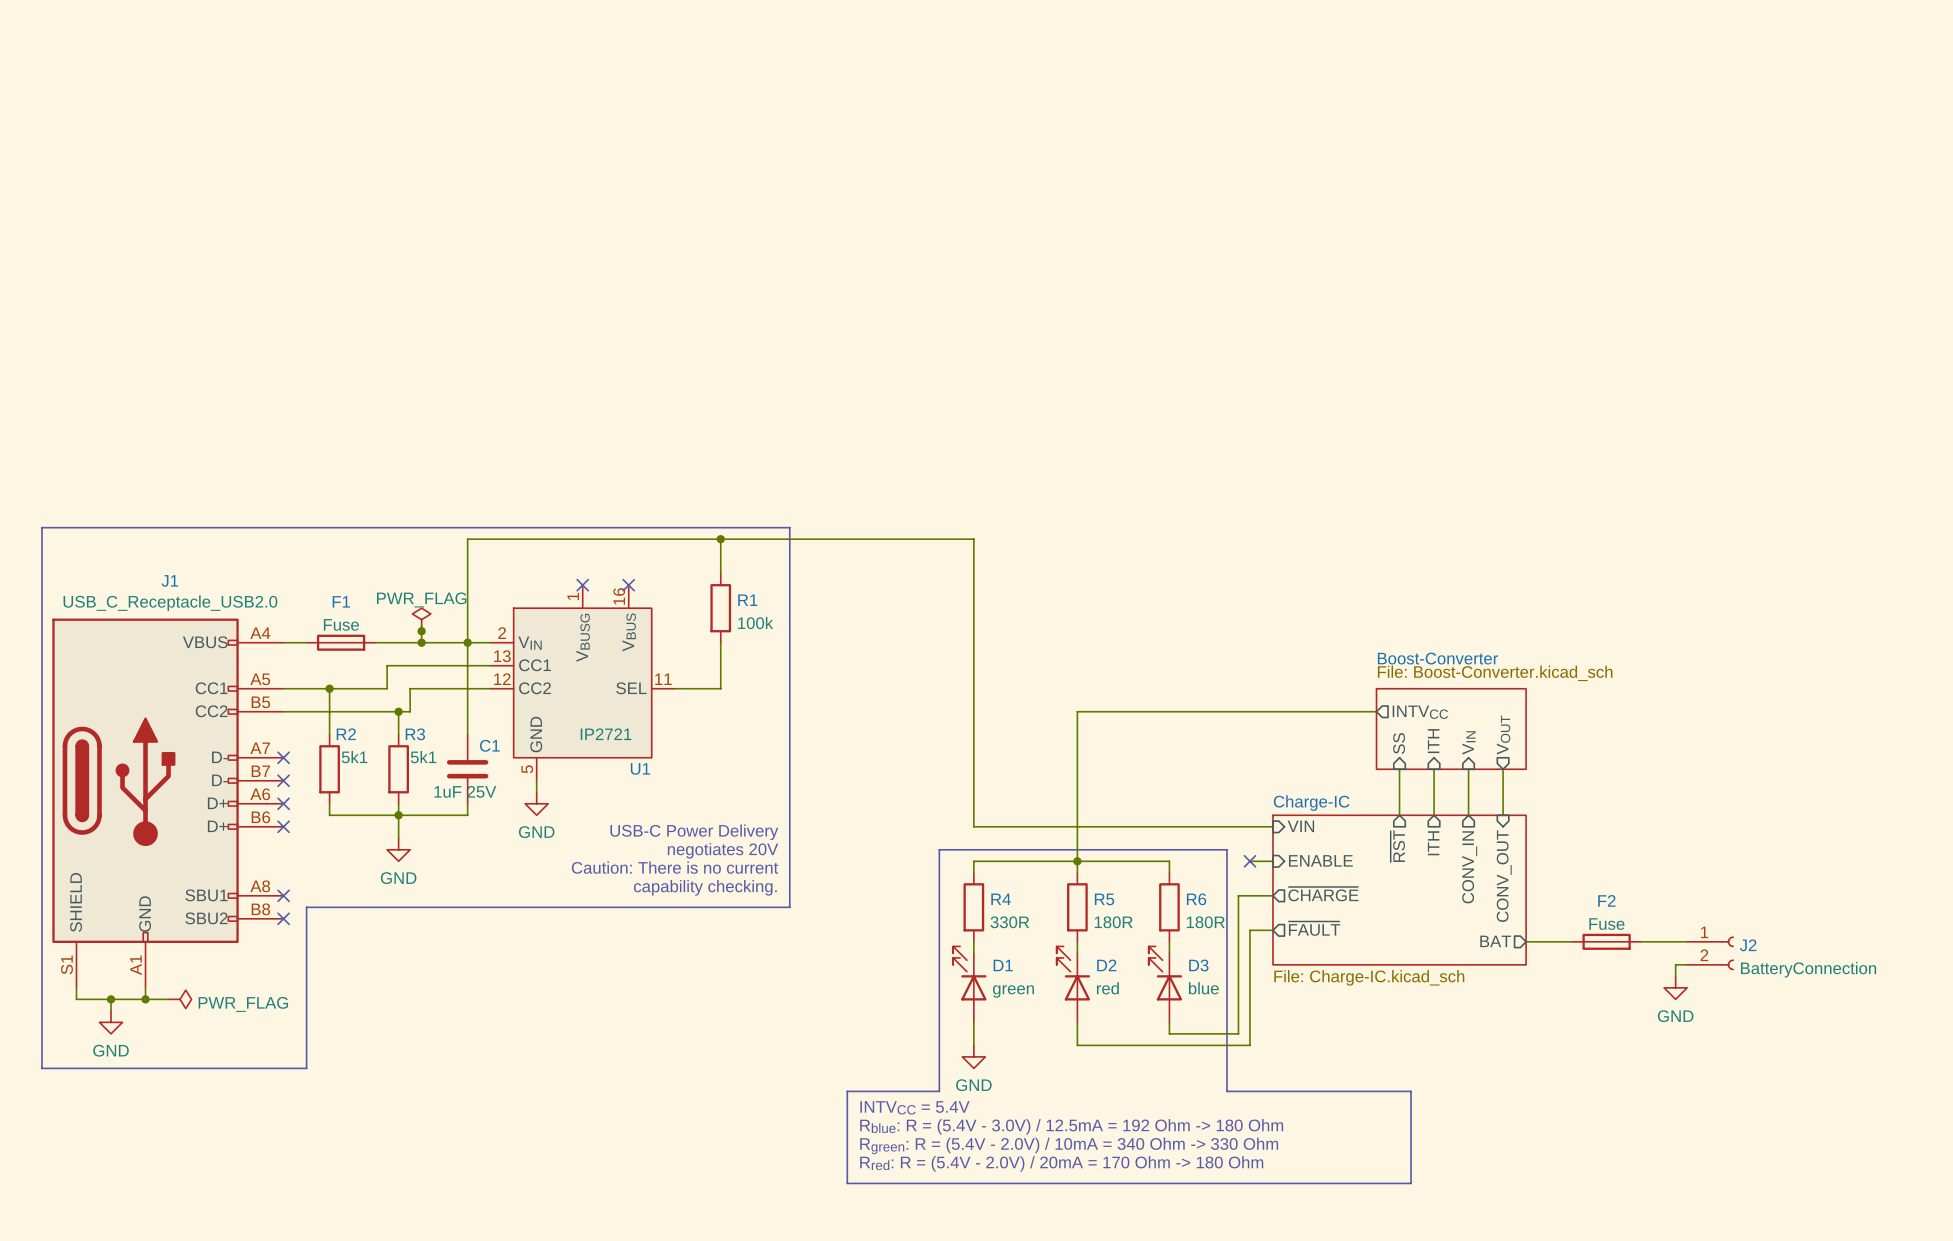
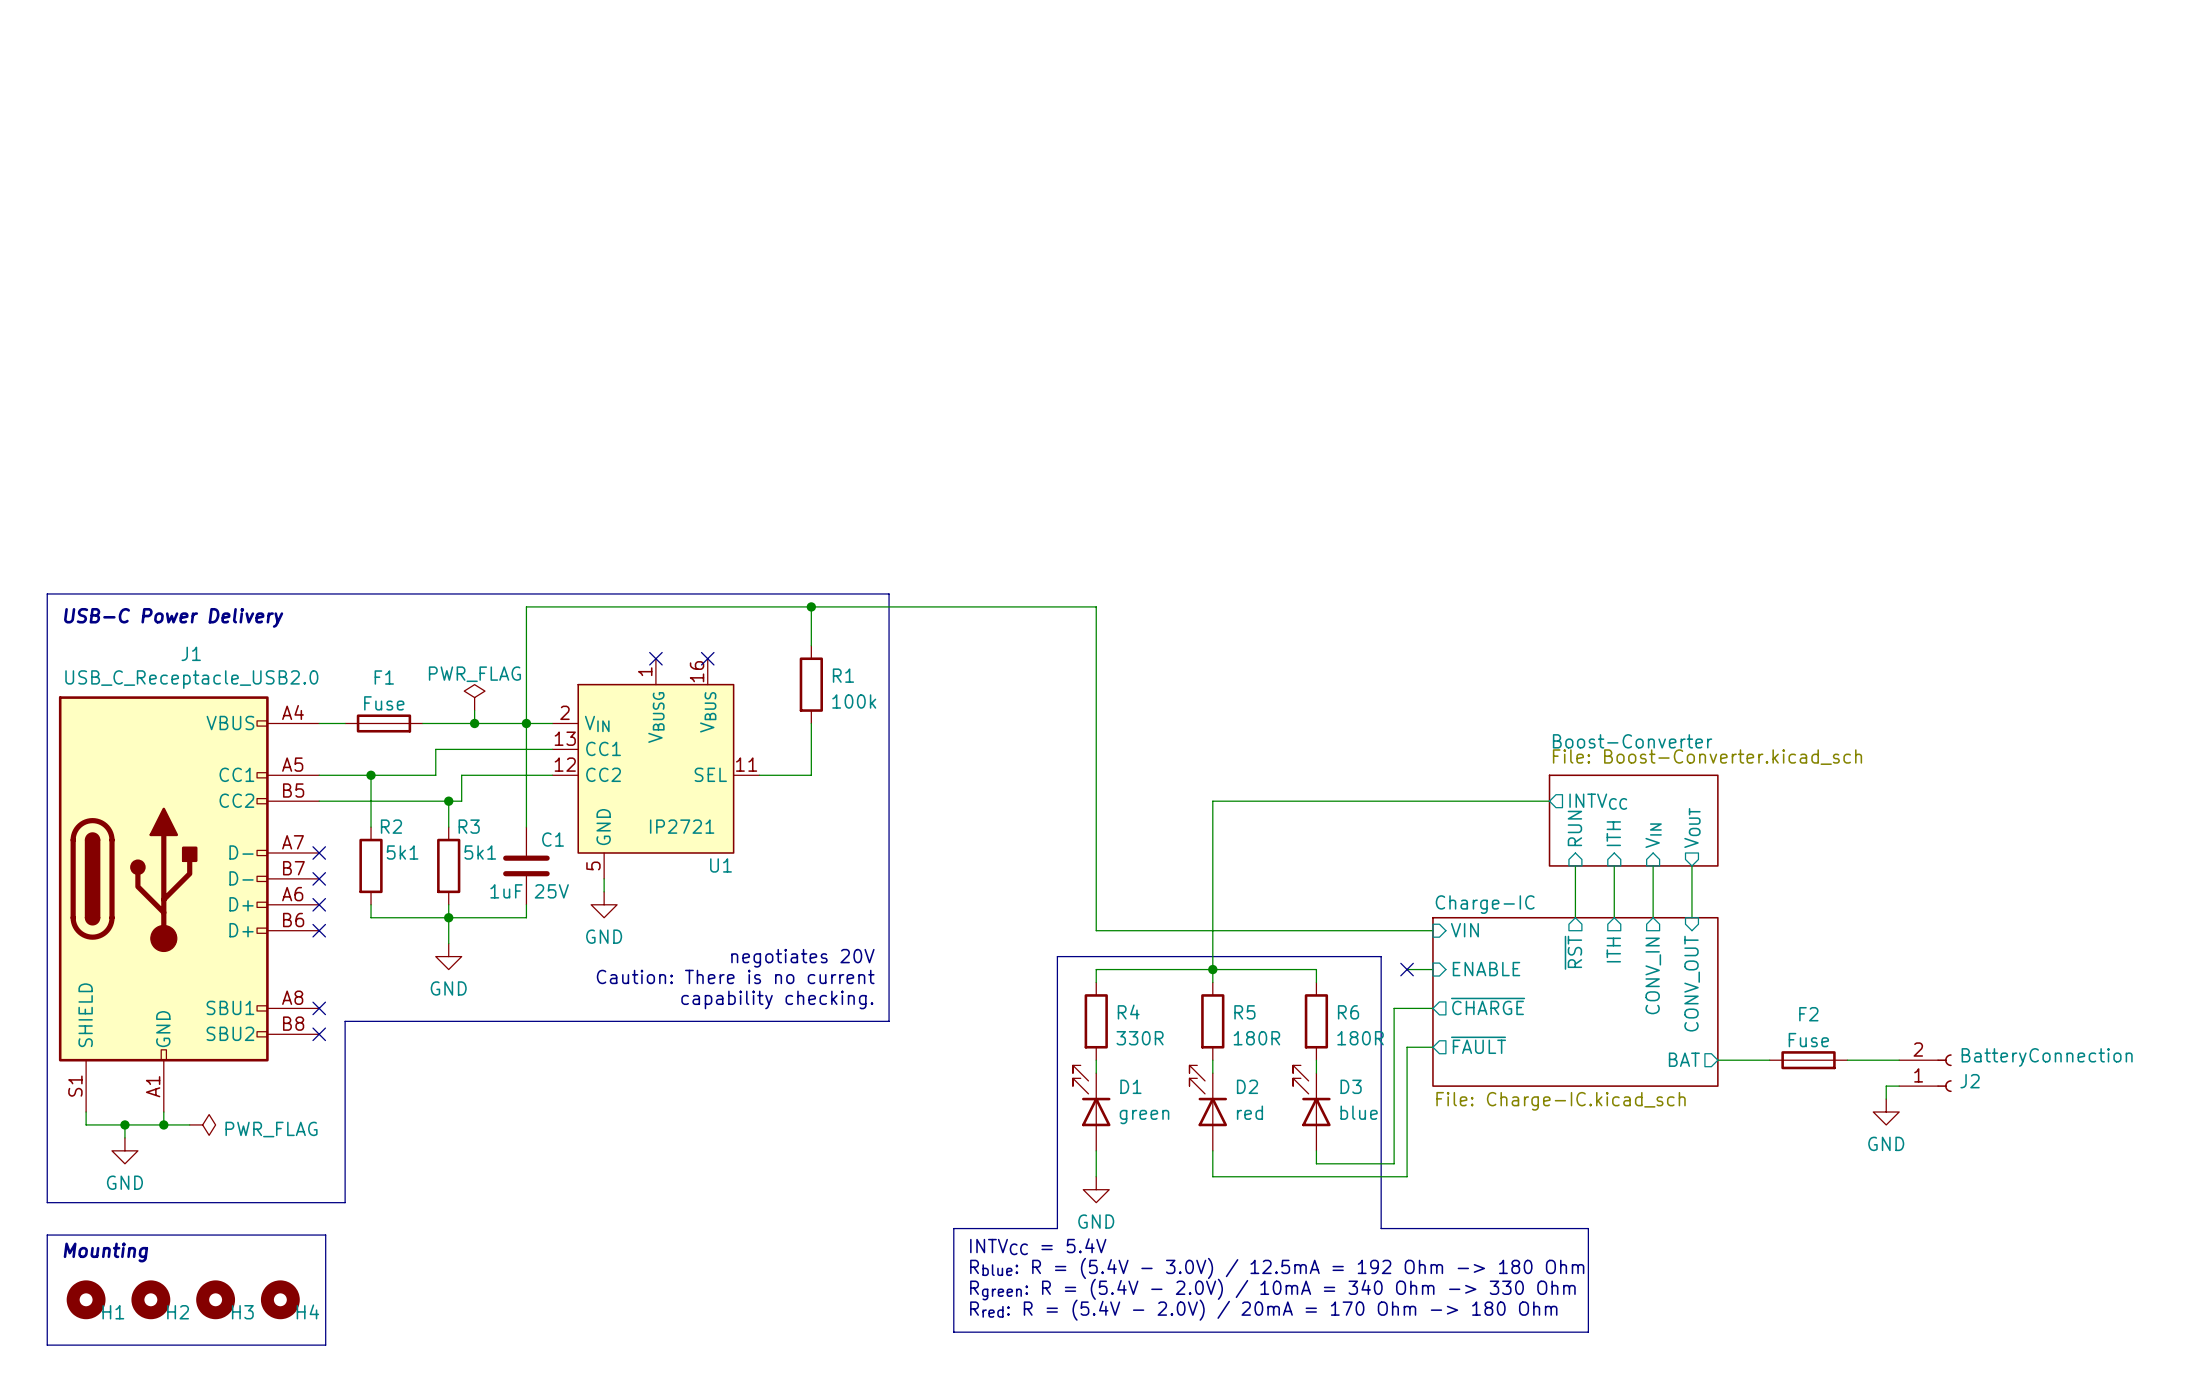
text: none -> USB-C Power Delivery (173, 617)
junction: (421, 631) -> none
sheet pin: SS (1399, 743) -> RUN (1574, 828)
text: USB-C Power Delivery (694, 832) -> none
J2 flip: as is (1727, 953) -> up-down (1944, 1073)
line: none -> (47, 1235) (325, 1235) (325, 1345) (47, 1345) (47, 1235)
text: none -> Mounting (105, 1252)
H1: none -> (86, 1299)
H2: none -> (150, 1299)
H3: none -> (215, 1299)
H4: none -> (280, 1299)

